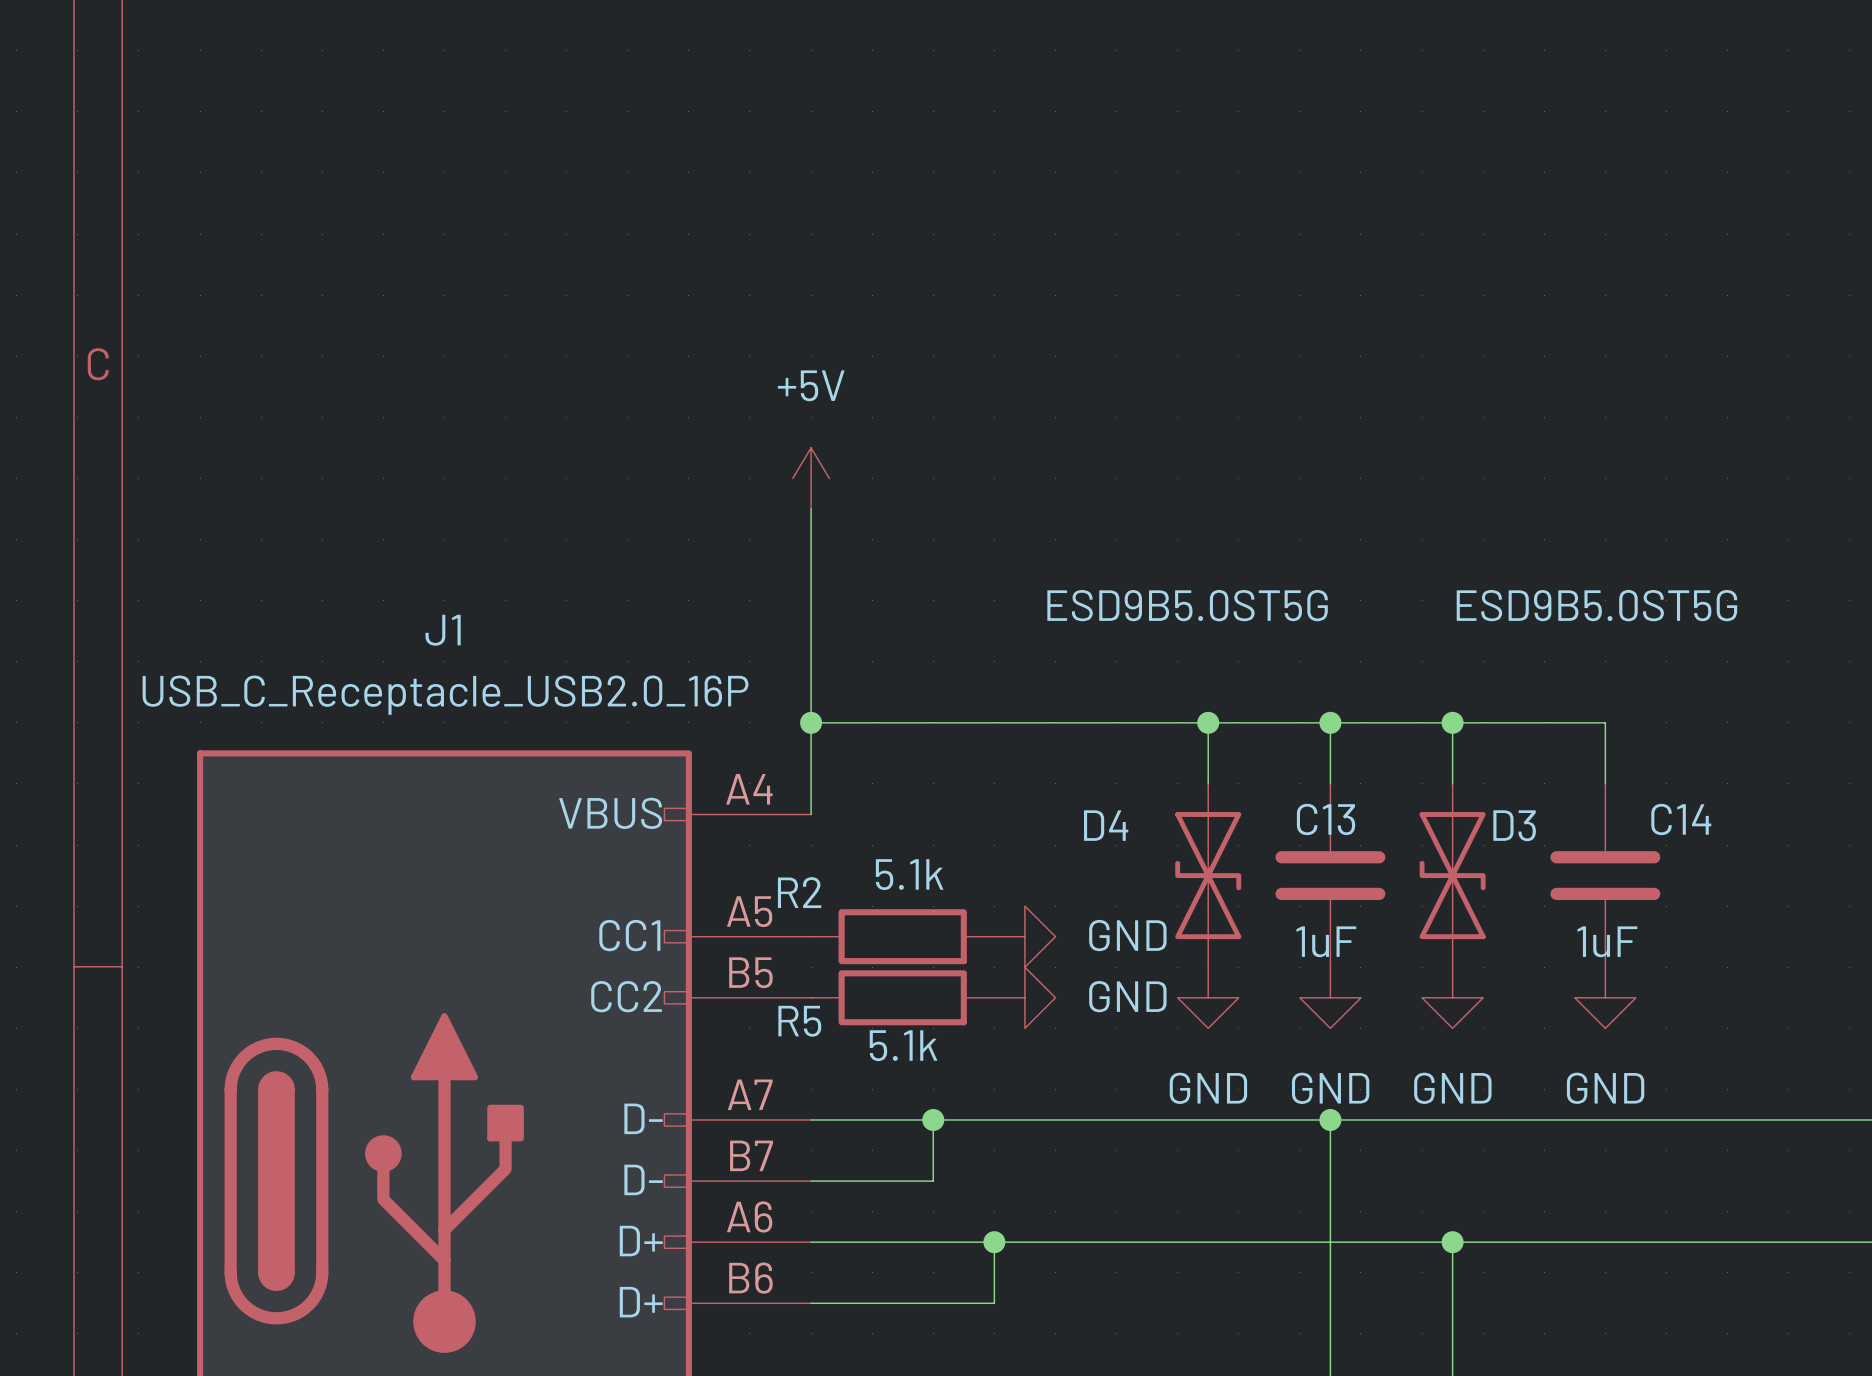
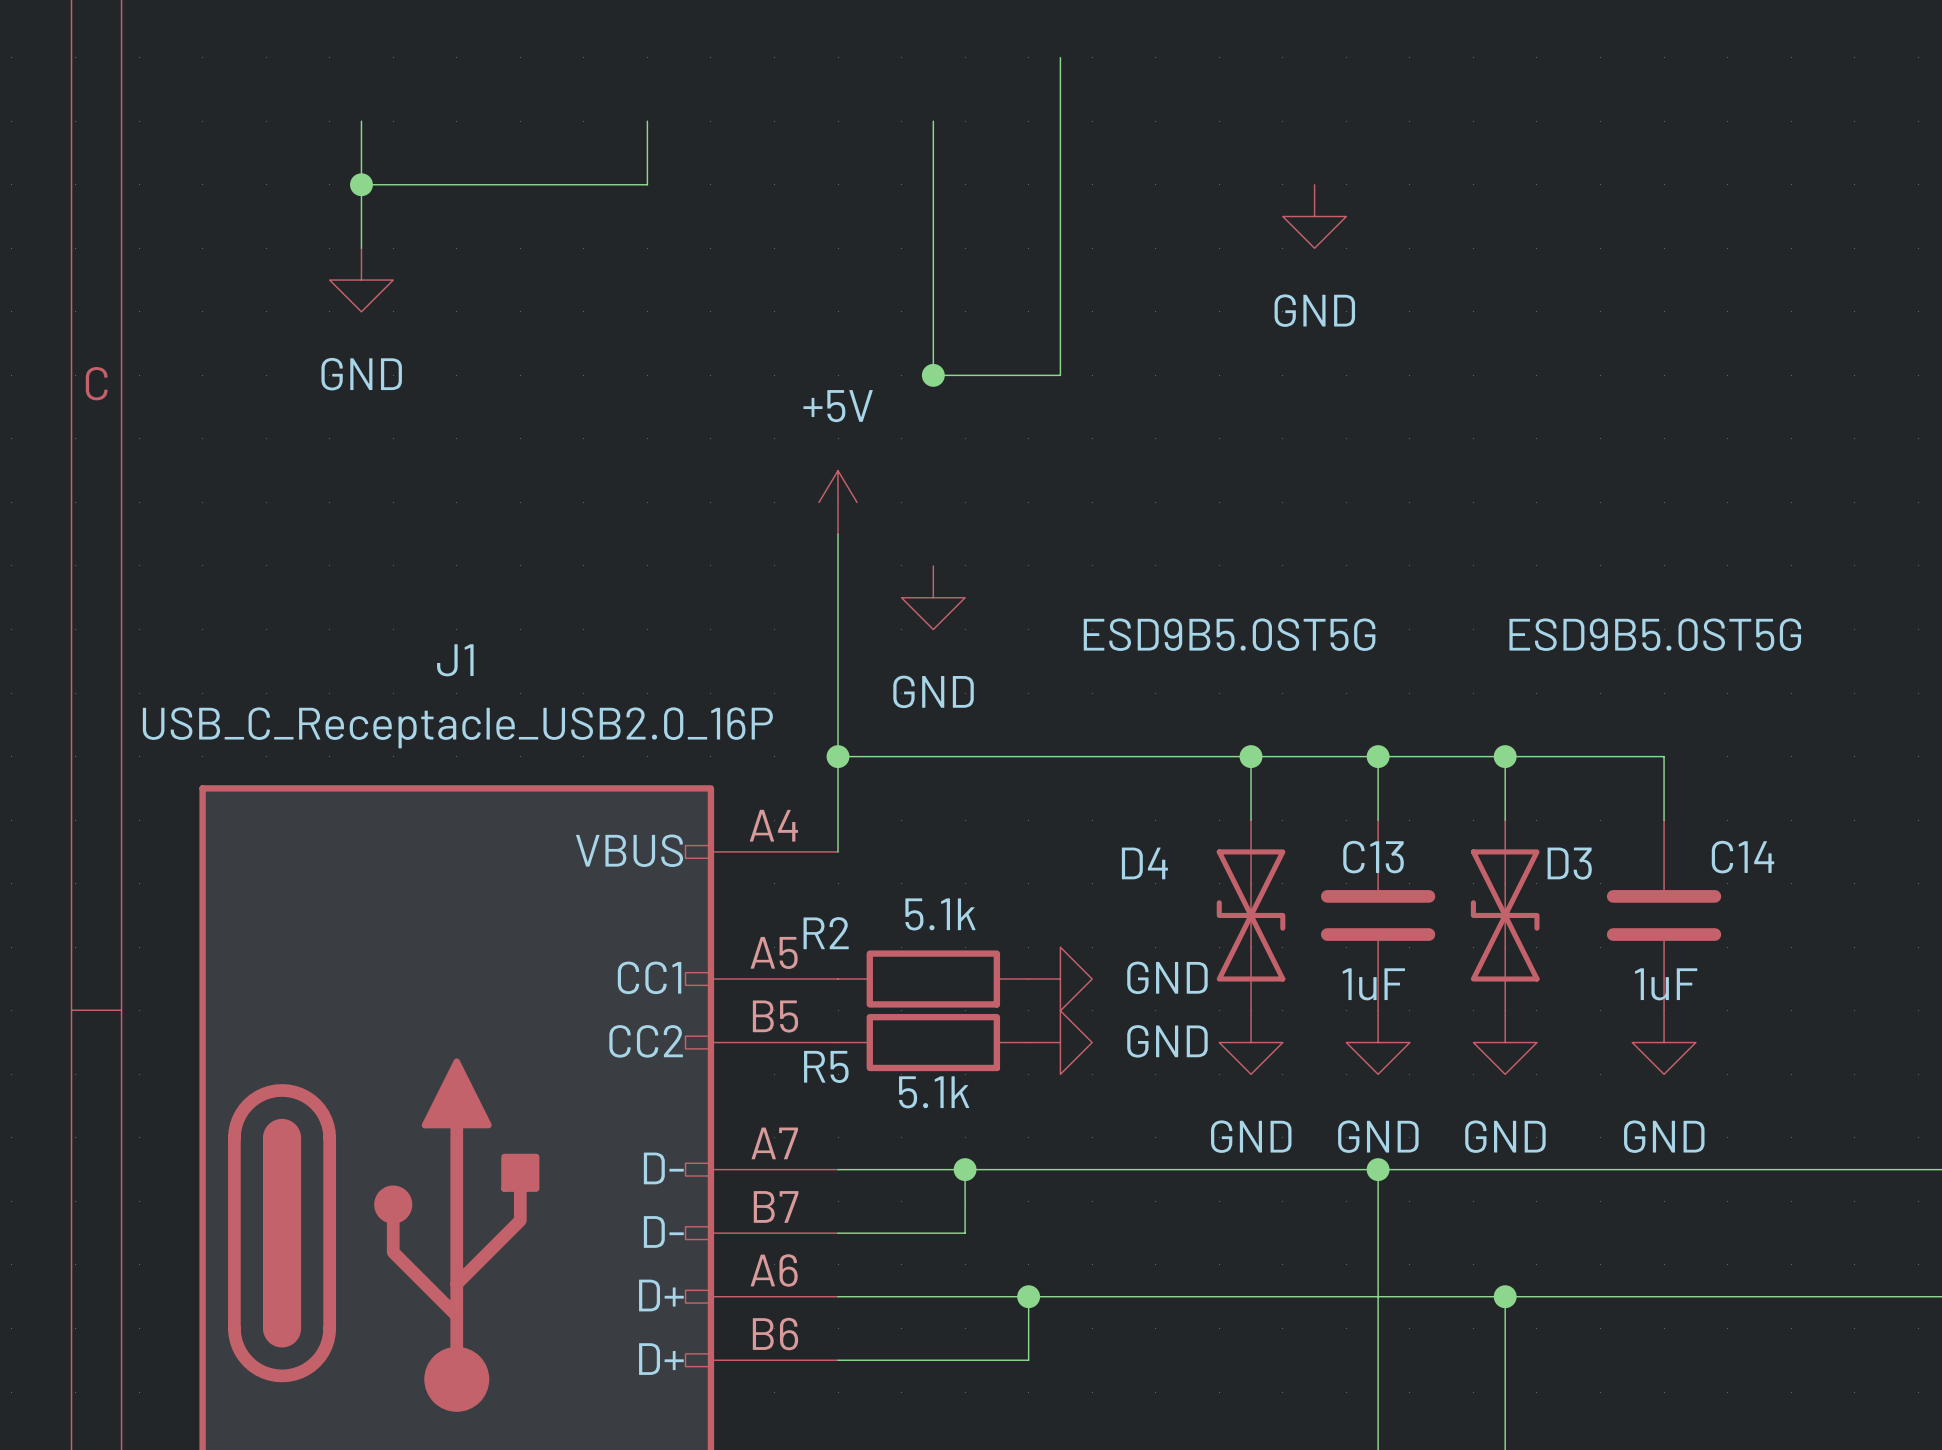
wire: none -> (1060, 57) (1060, 375) (933, 375) (933, 121)
wire: none -> (361, 121) (361, 248)
wire: none -> (647, 121) (647, 184) (361, 184)
junction: none -> (361, 184)
power symbol: none -> GND (1314, 216)
power symbol: none -> GND (361, 280)
junction: none -> (933, 375)
power symbol: none -> GND (933, 597)

